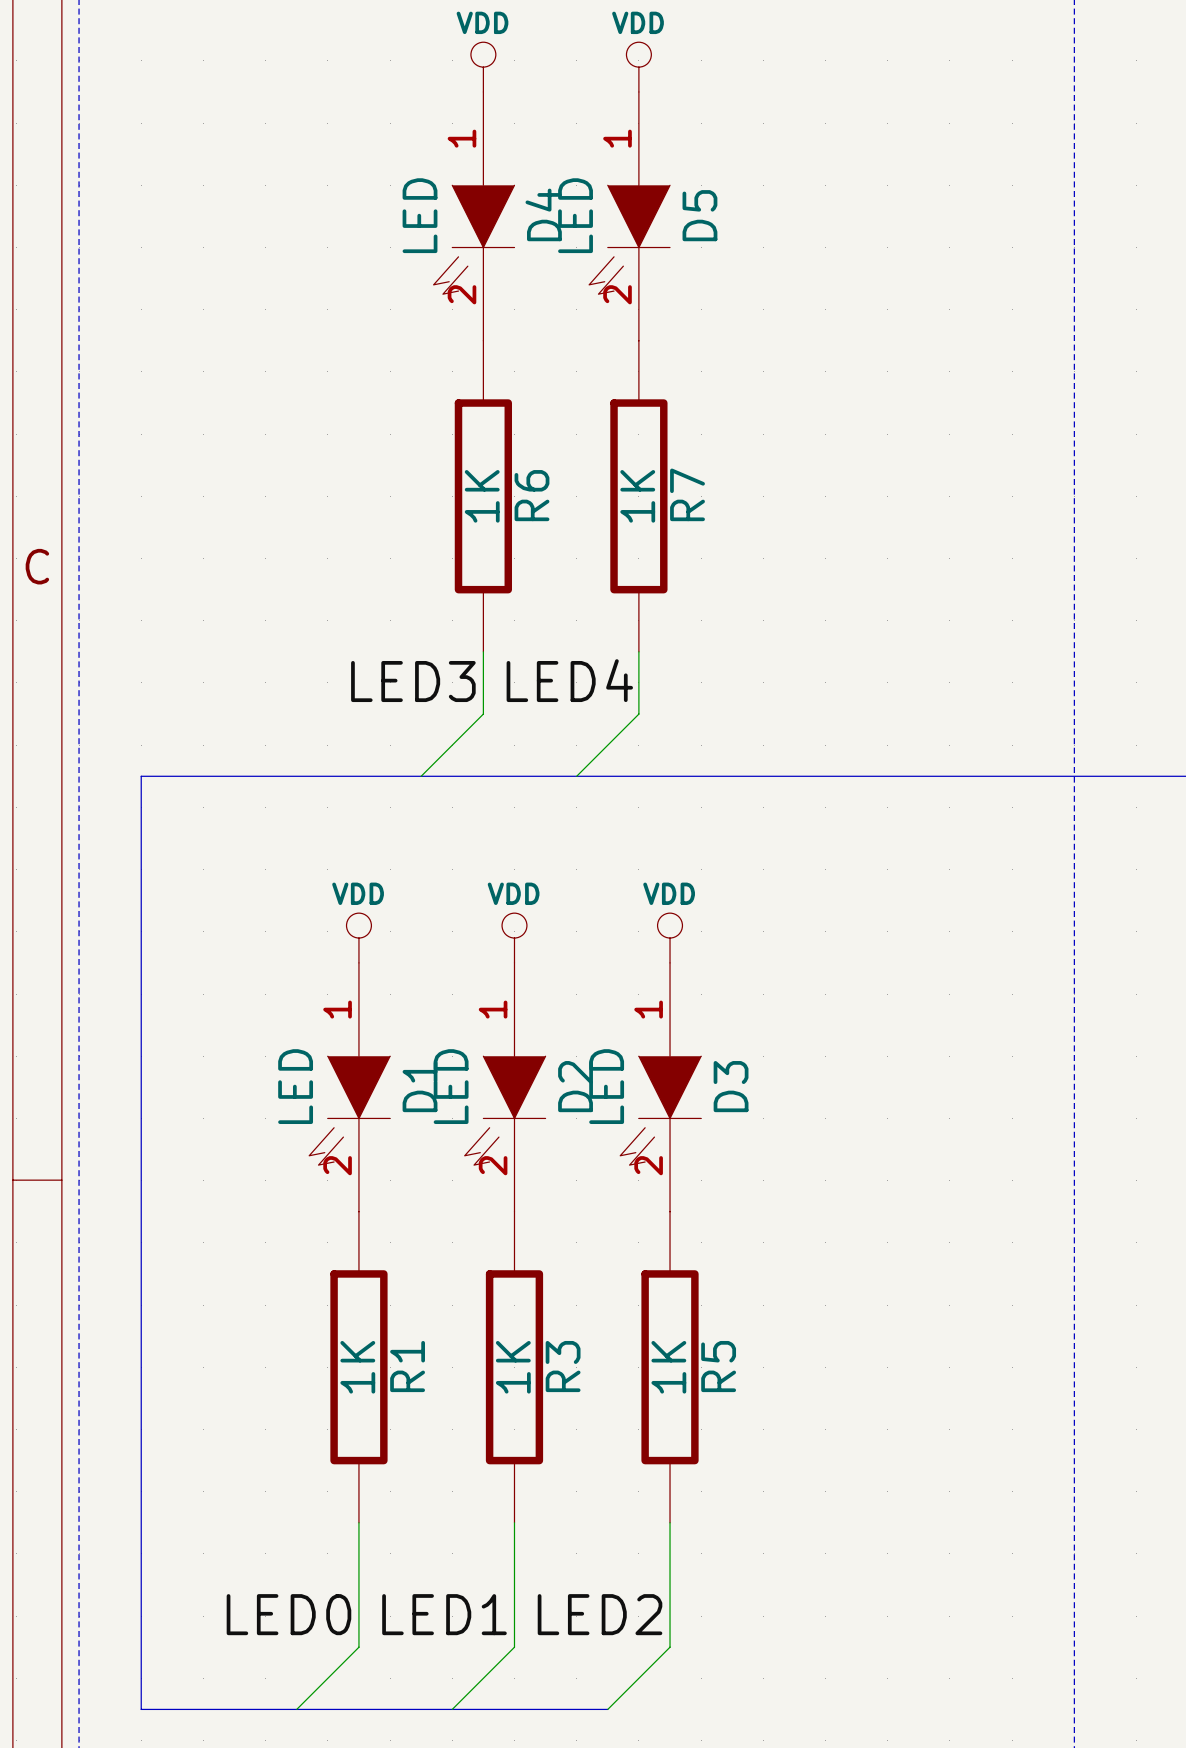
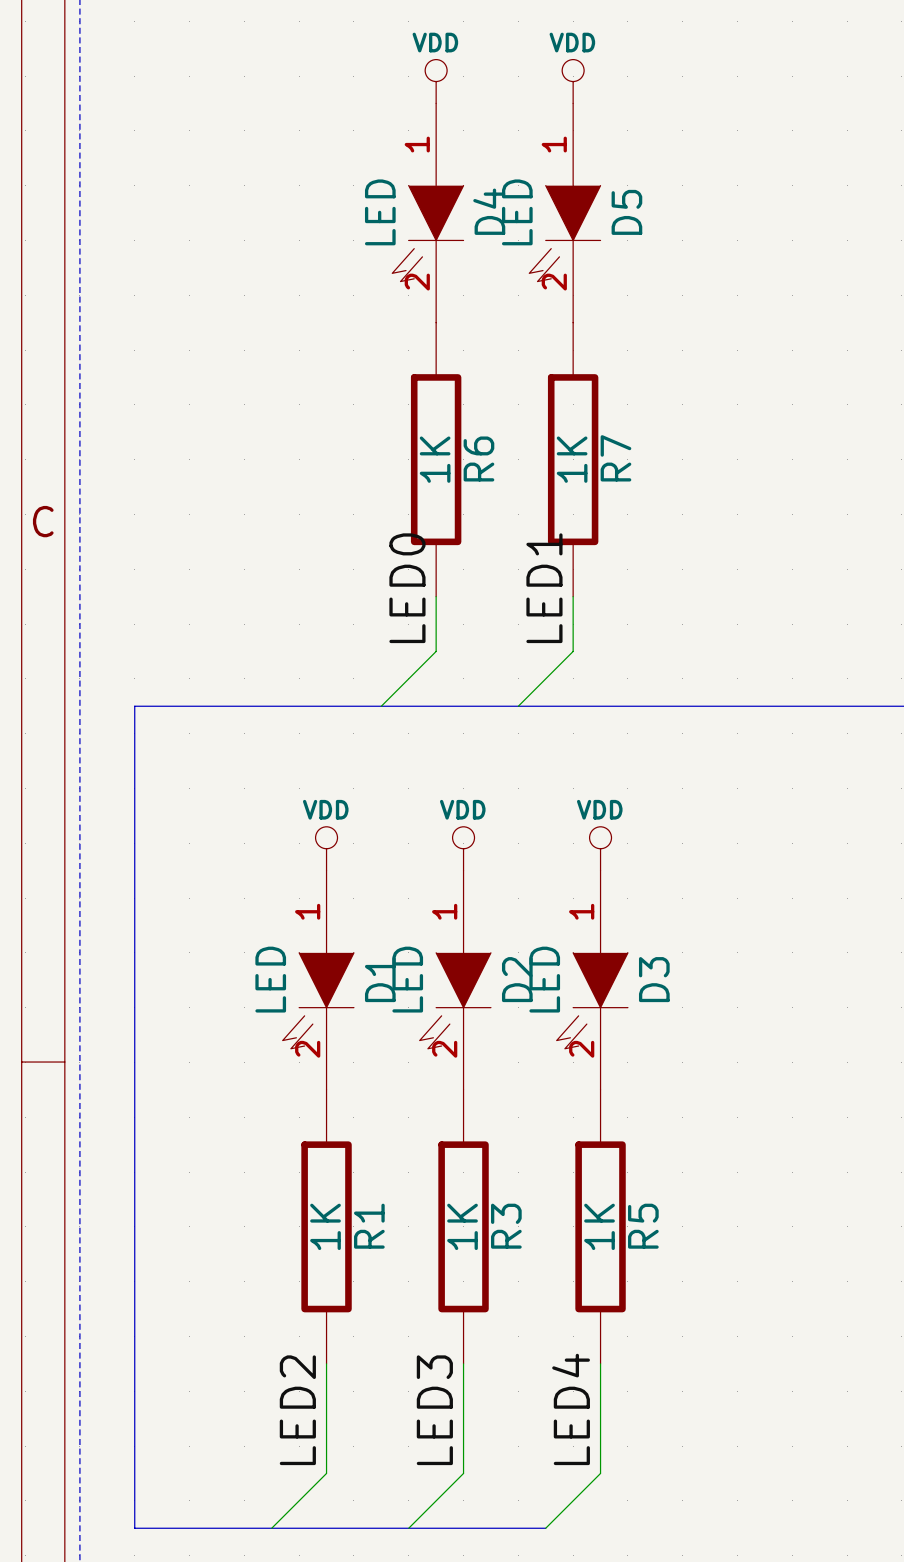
label: LED4 (569, 680) -> LED1 (544, 588)
label: LED3 (413, 681) -> LED0 (407, 588)
label: LED0 (288, 1614) -> LED2 (297, 1410)
label: LED1 (444, 1614) -> LED3 (434, 1410)
label: LED2 (600, 1614) -> LED4 (571, 1409)

